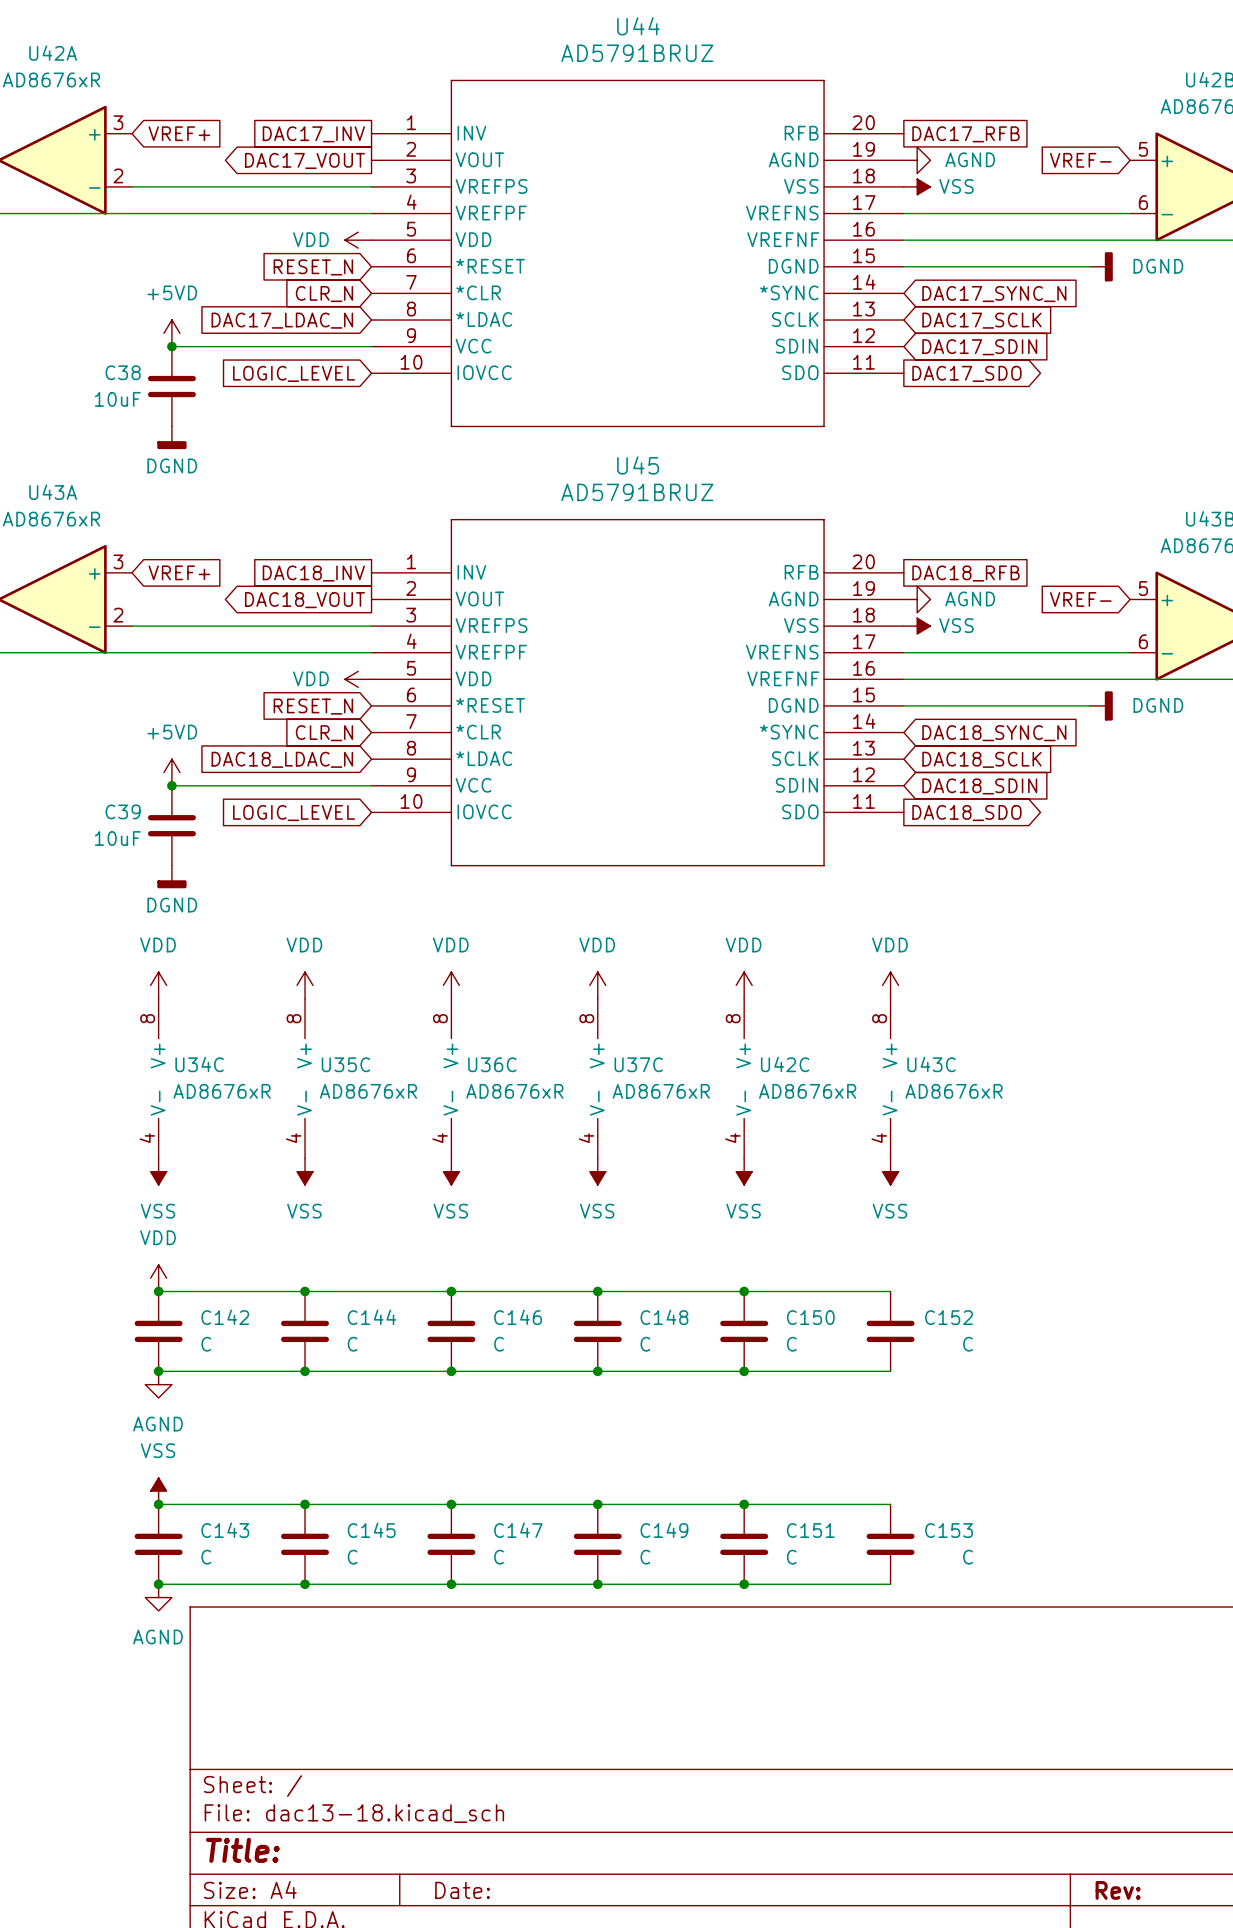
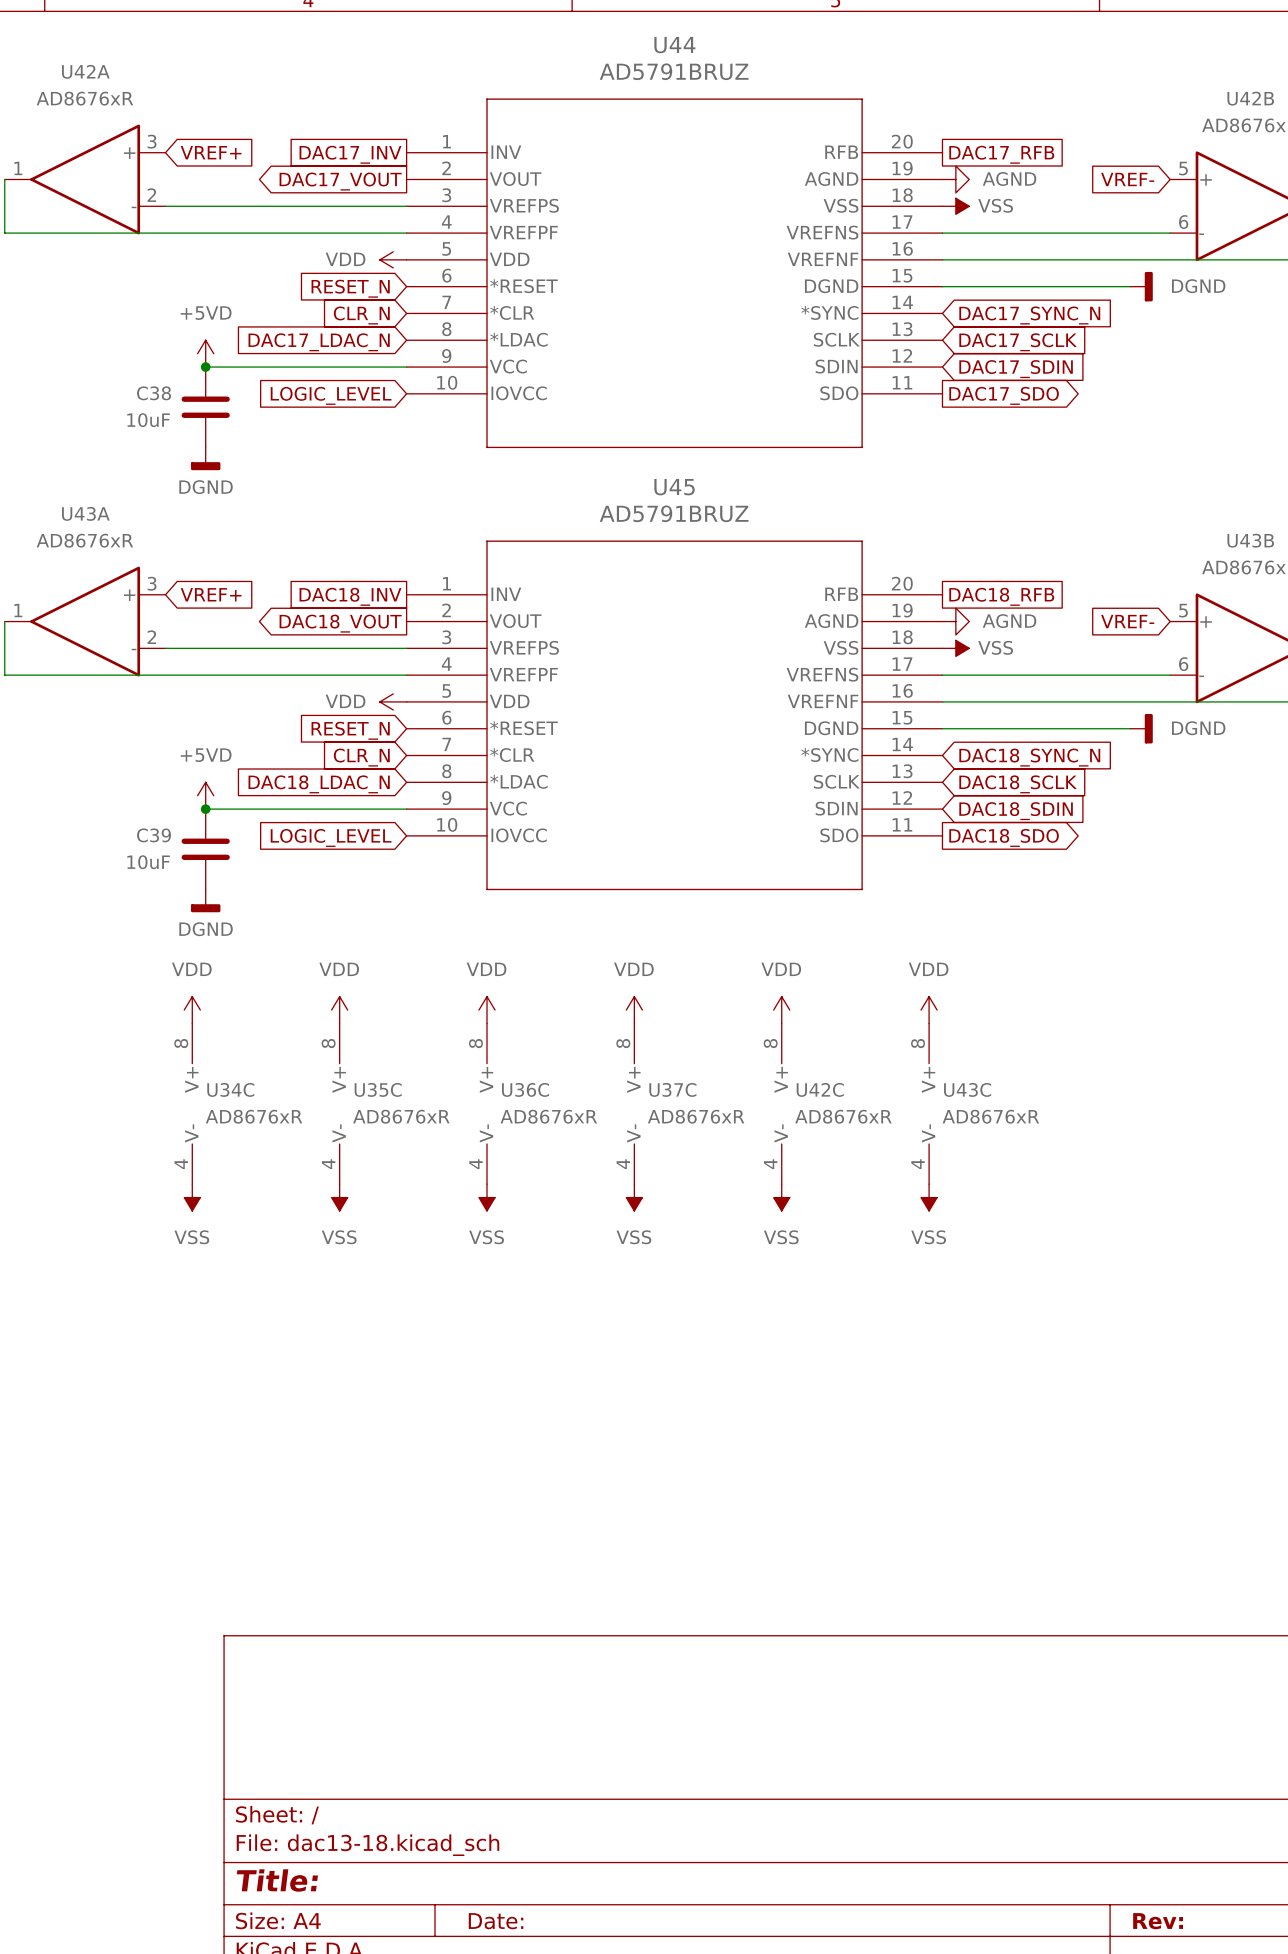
power symbol: VDD (158, 1278) -> none
wire: (158, 1291) (890, 1291) -> none
junction: (158, 1291) -> none
junction: (305, 1291) -> none
junction: (451, 1291) -> none
junction: (597, 1291) -> none
junction: (744, 1291) -> none
C142: C (158, 1331) -> none
C144: C (305, 1331) -> none
C146: C (451, 1331) -> none
C148: C (597, 1331) -> none
C150: C (744, 1331) -> none
C152: C (890, 1331) -> none
wire: (158, 1371) (890, 1371) -> none
junction: (158, 1371) -> none
junction: (305, 1371) -> none
junction: (451, 1371) -> none
junction: (597, 1371) -> none
junction: (744, 1371) -> none
power symbol: AGND (158, 1384) -> none
power symbol: VSS (158, 1491) -> none
wire: (158, 1504) (890, 1504) -> none
junction: (158, 1504) -> none
junction: (305, 1504) -> none
junction: (451, 1504) -> none
junction: (597, 1504) -> none
junction: (744, 1504) -> none
C143: C (158, 1544) -> none
C145: C (305, 1544) -> none
C147: C (451, 1544) -> none
C149: C (597, 1544) -> none
C151: C (744, 1544) -> none
C153: C (890, 1544) -> none
wire: (158, 1584) (890, 1584) -> none
junction: (158, 1584) -> none
junction: (305, 1584) -> none
junction: (451, 1584) -> none
junction: (597, 1584) -> none
junction: (744, 1584) -> none
power symbol: AGND (158, 1597) -> none

